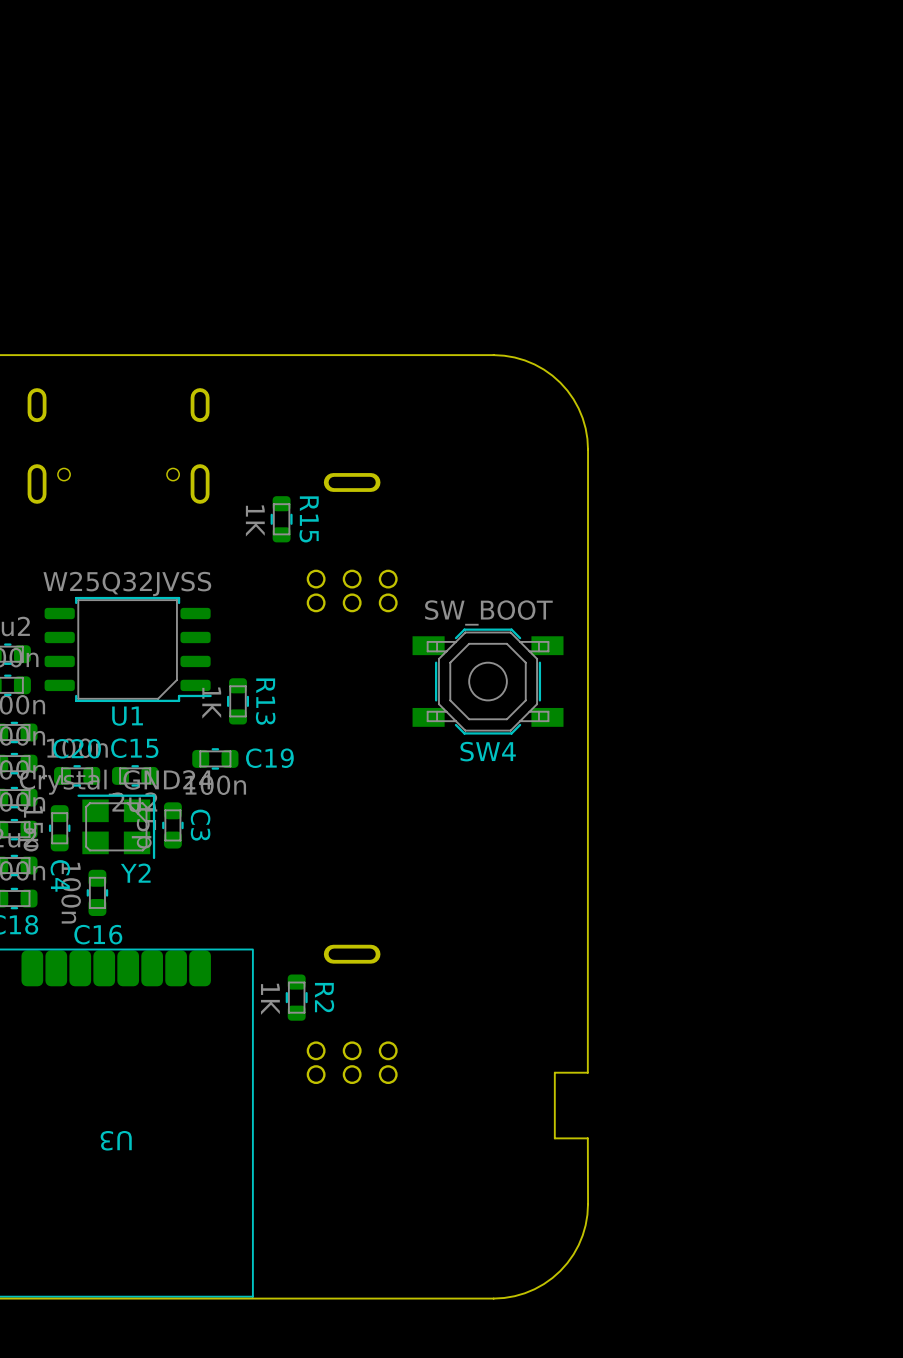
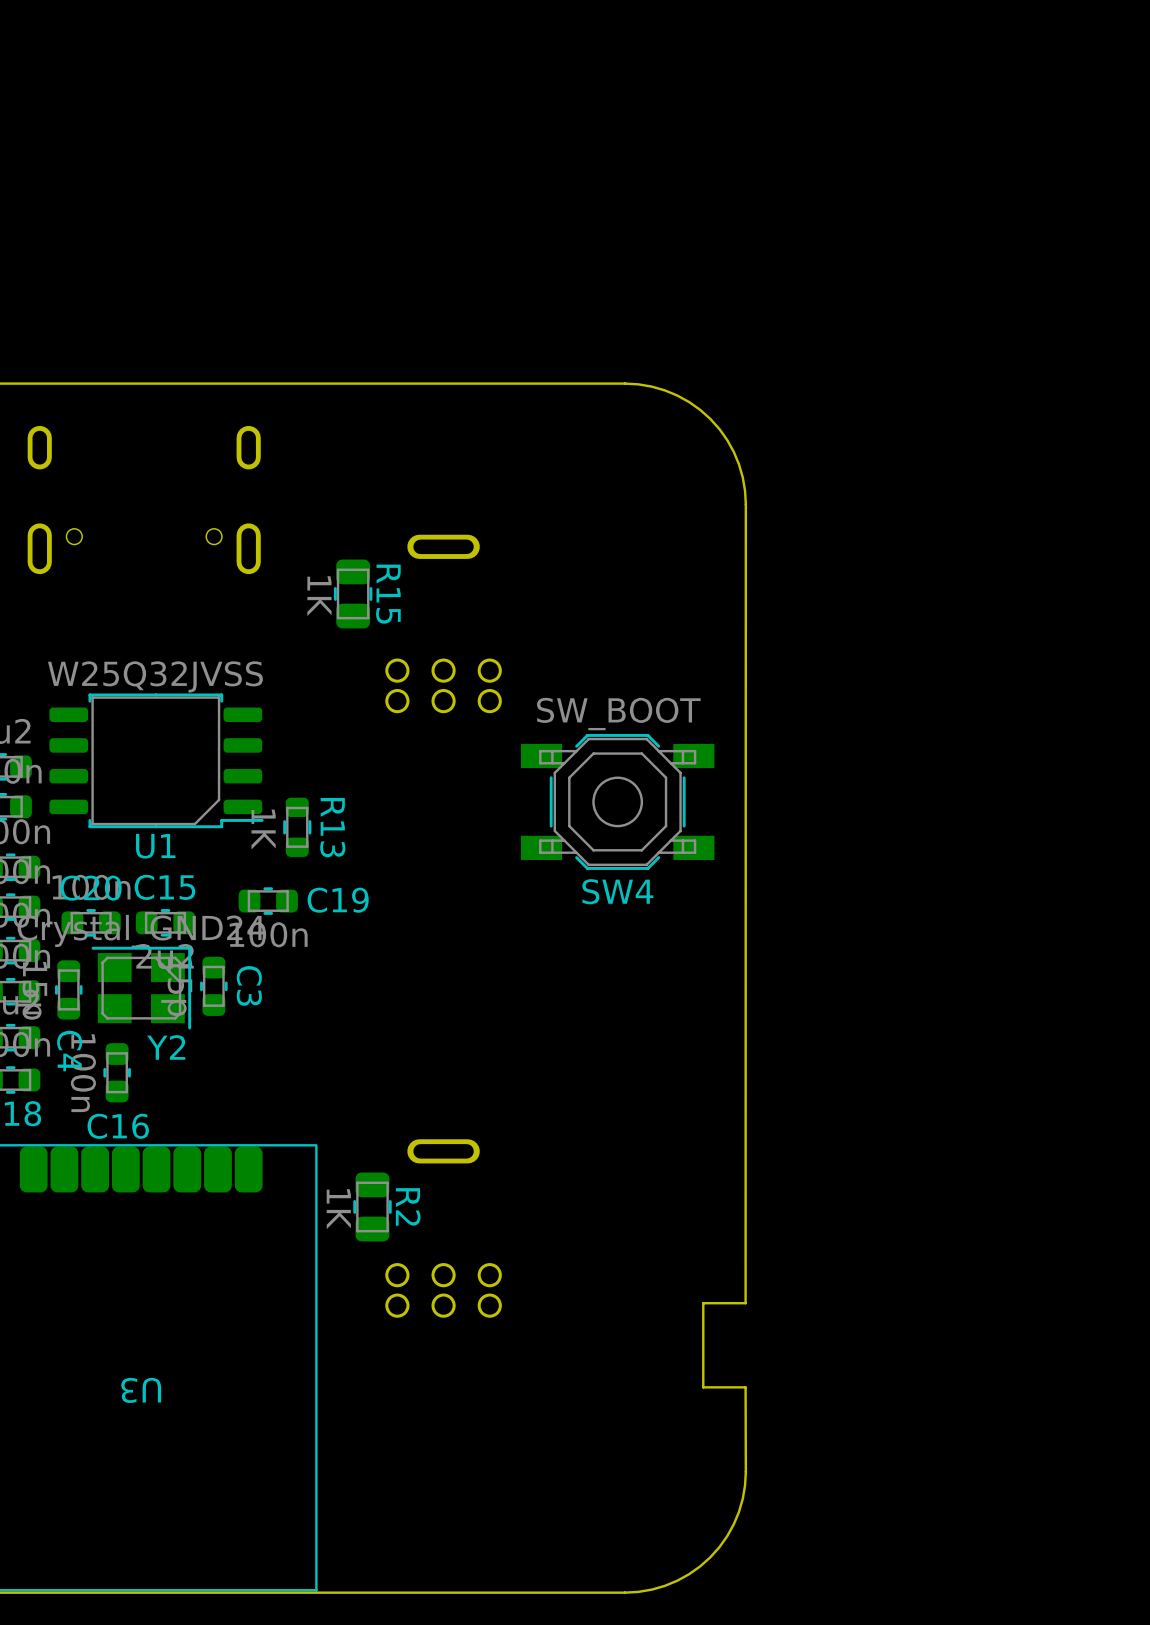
R15 footprint: [270, 496, 293, 543] -> [333, 559, 373, 629]
R2 footprint: [285, 974, 308, 1021] -> [353, 1172, 392, 1242]

